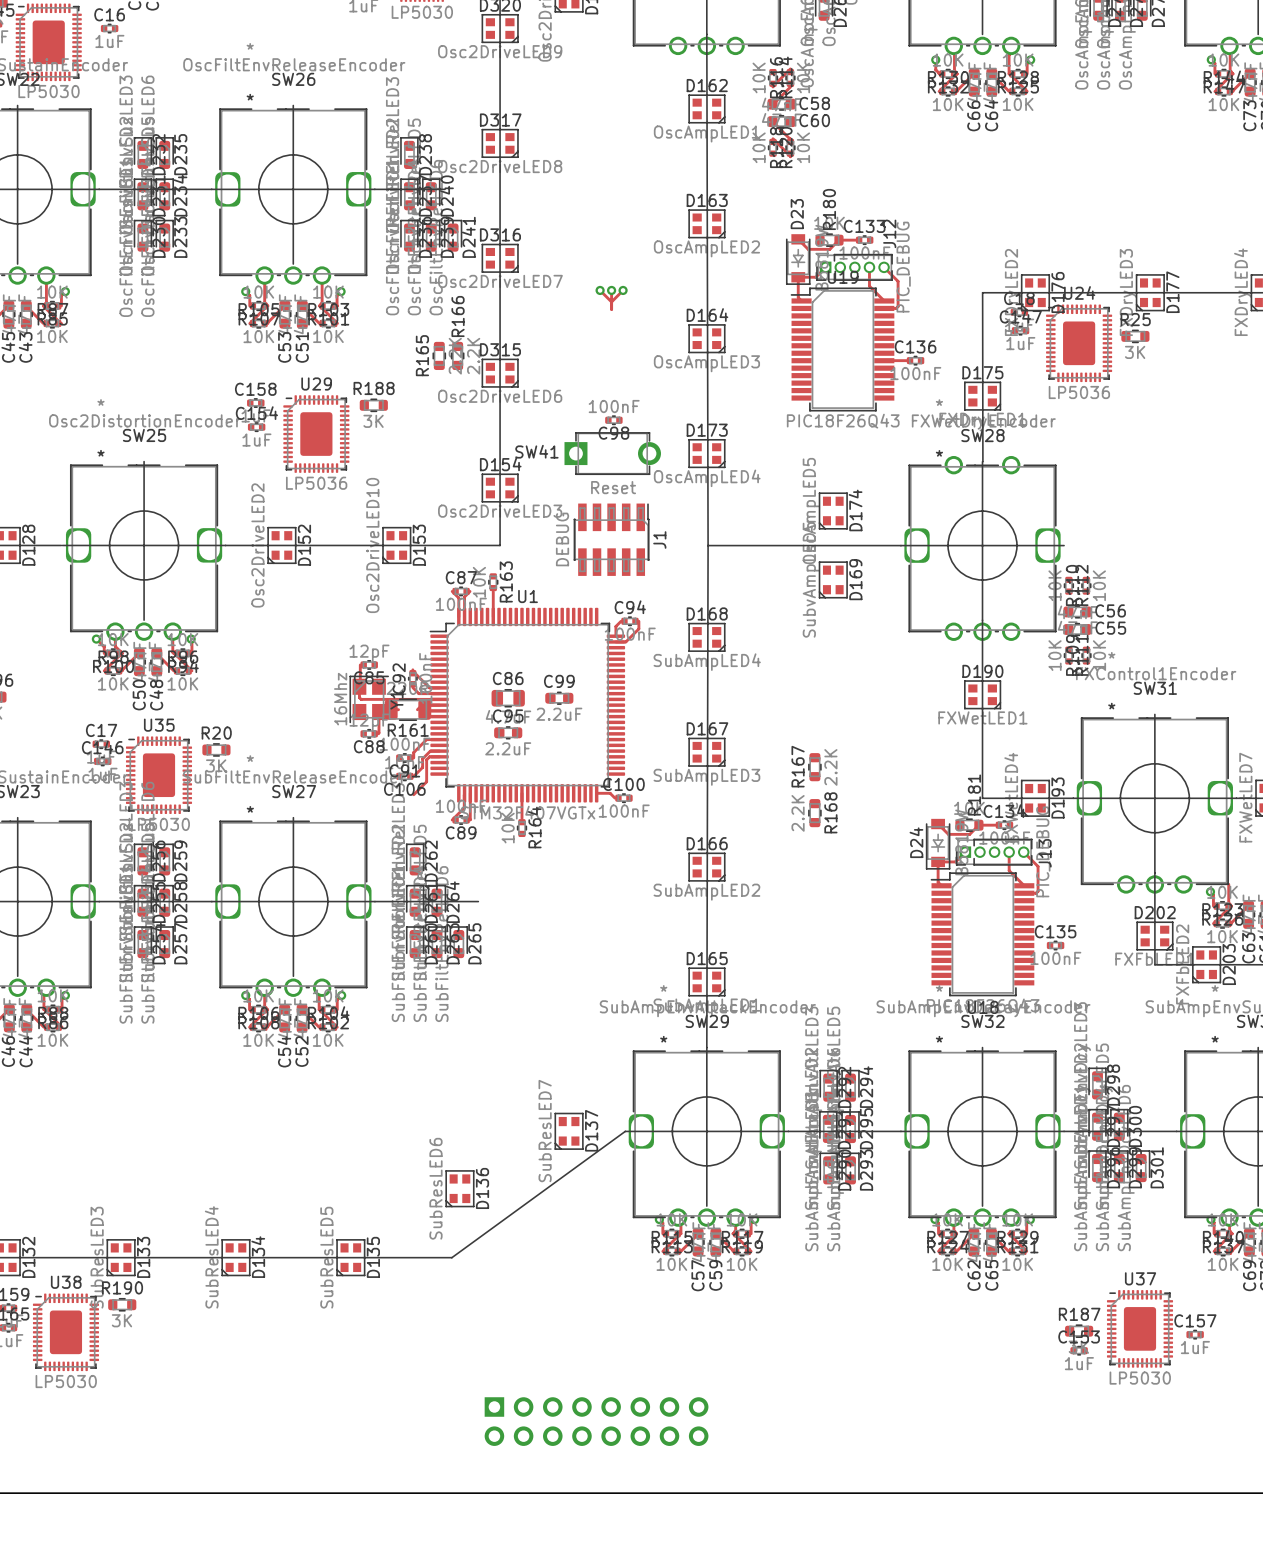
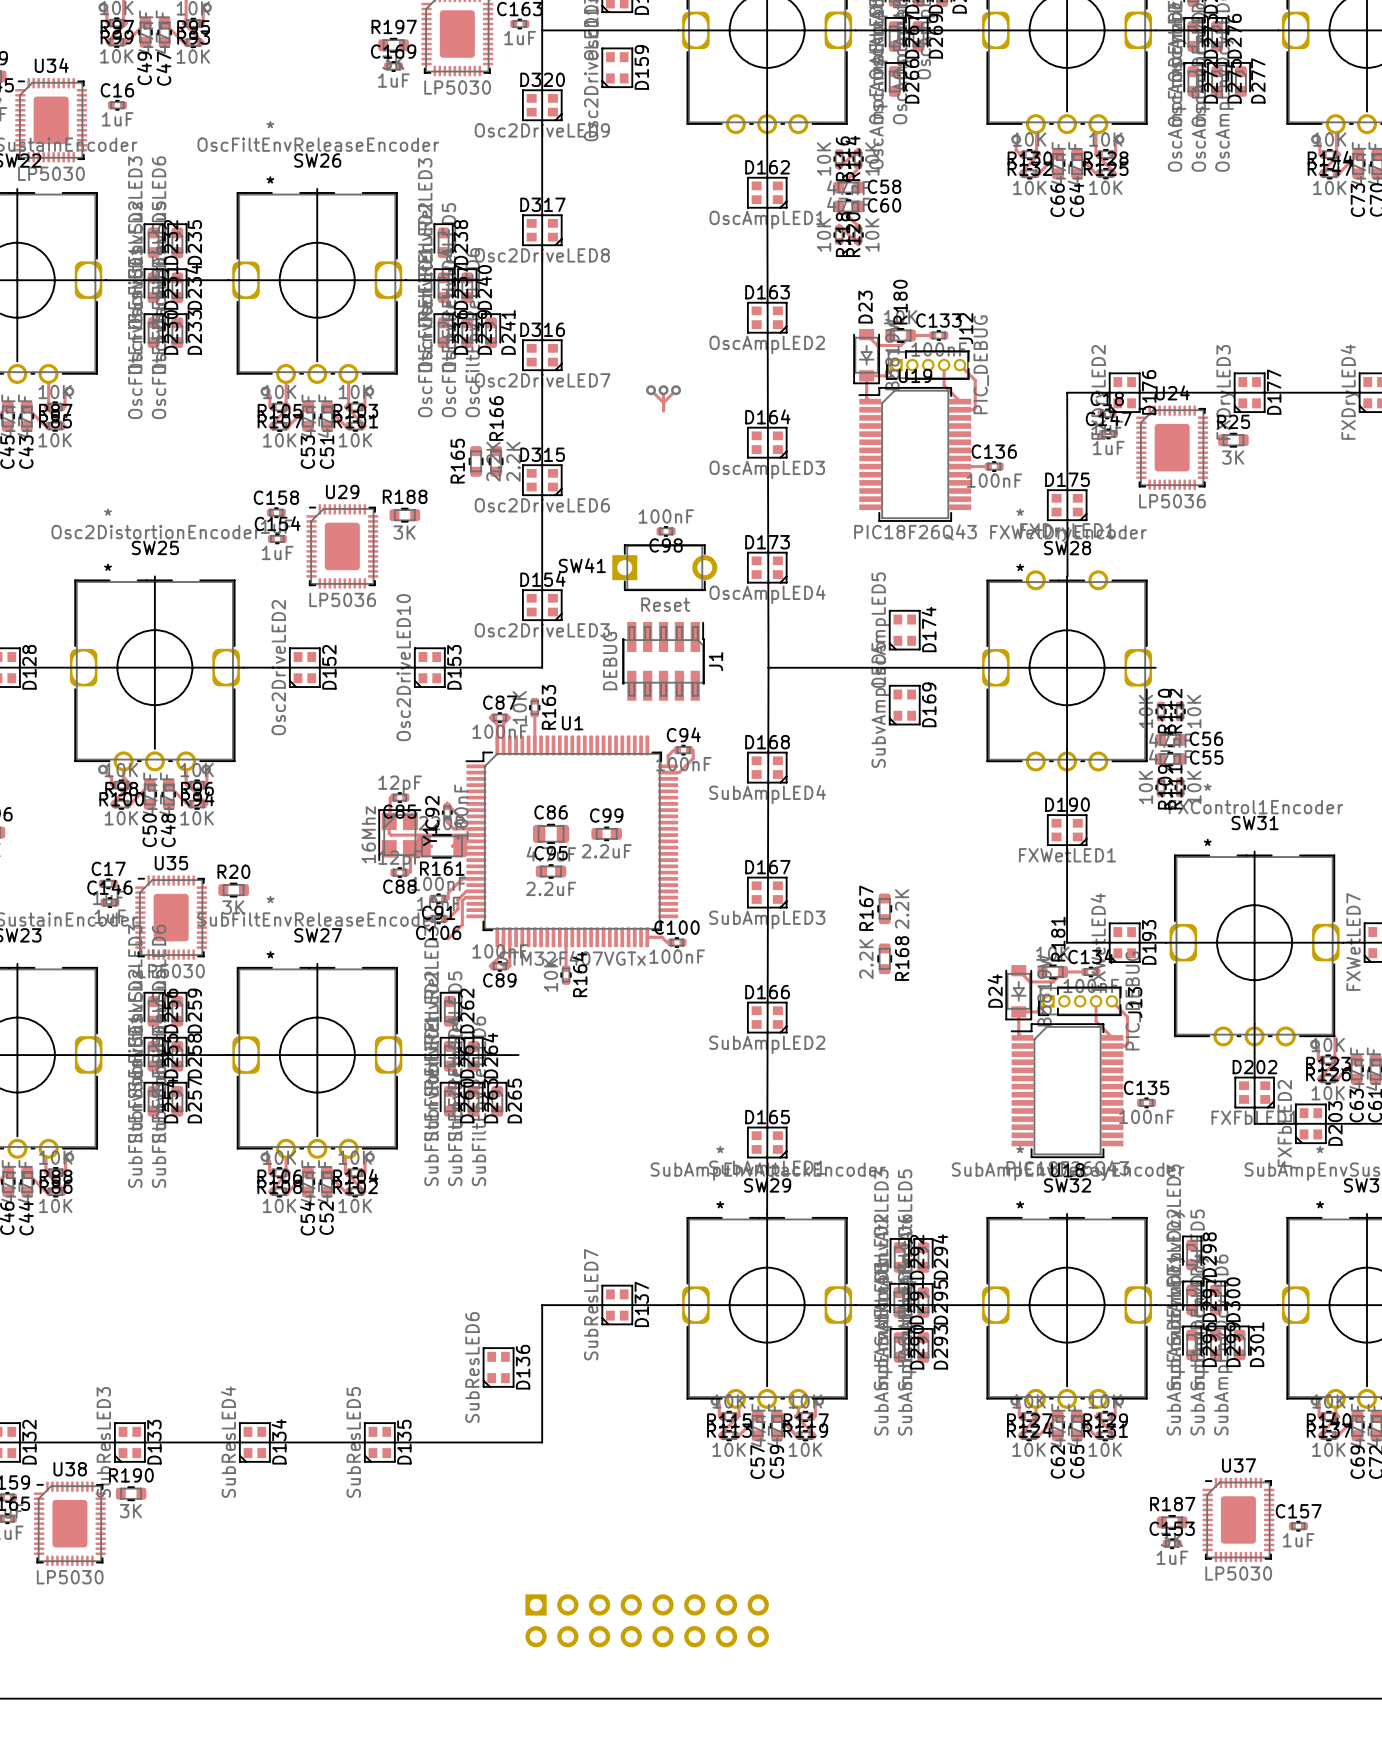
line: (625, 1131) (451, 1257) -> (678, 1305) (542, 1305) (542, 1442) (489, 1442)

